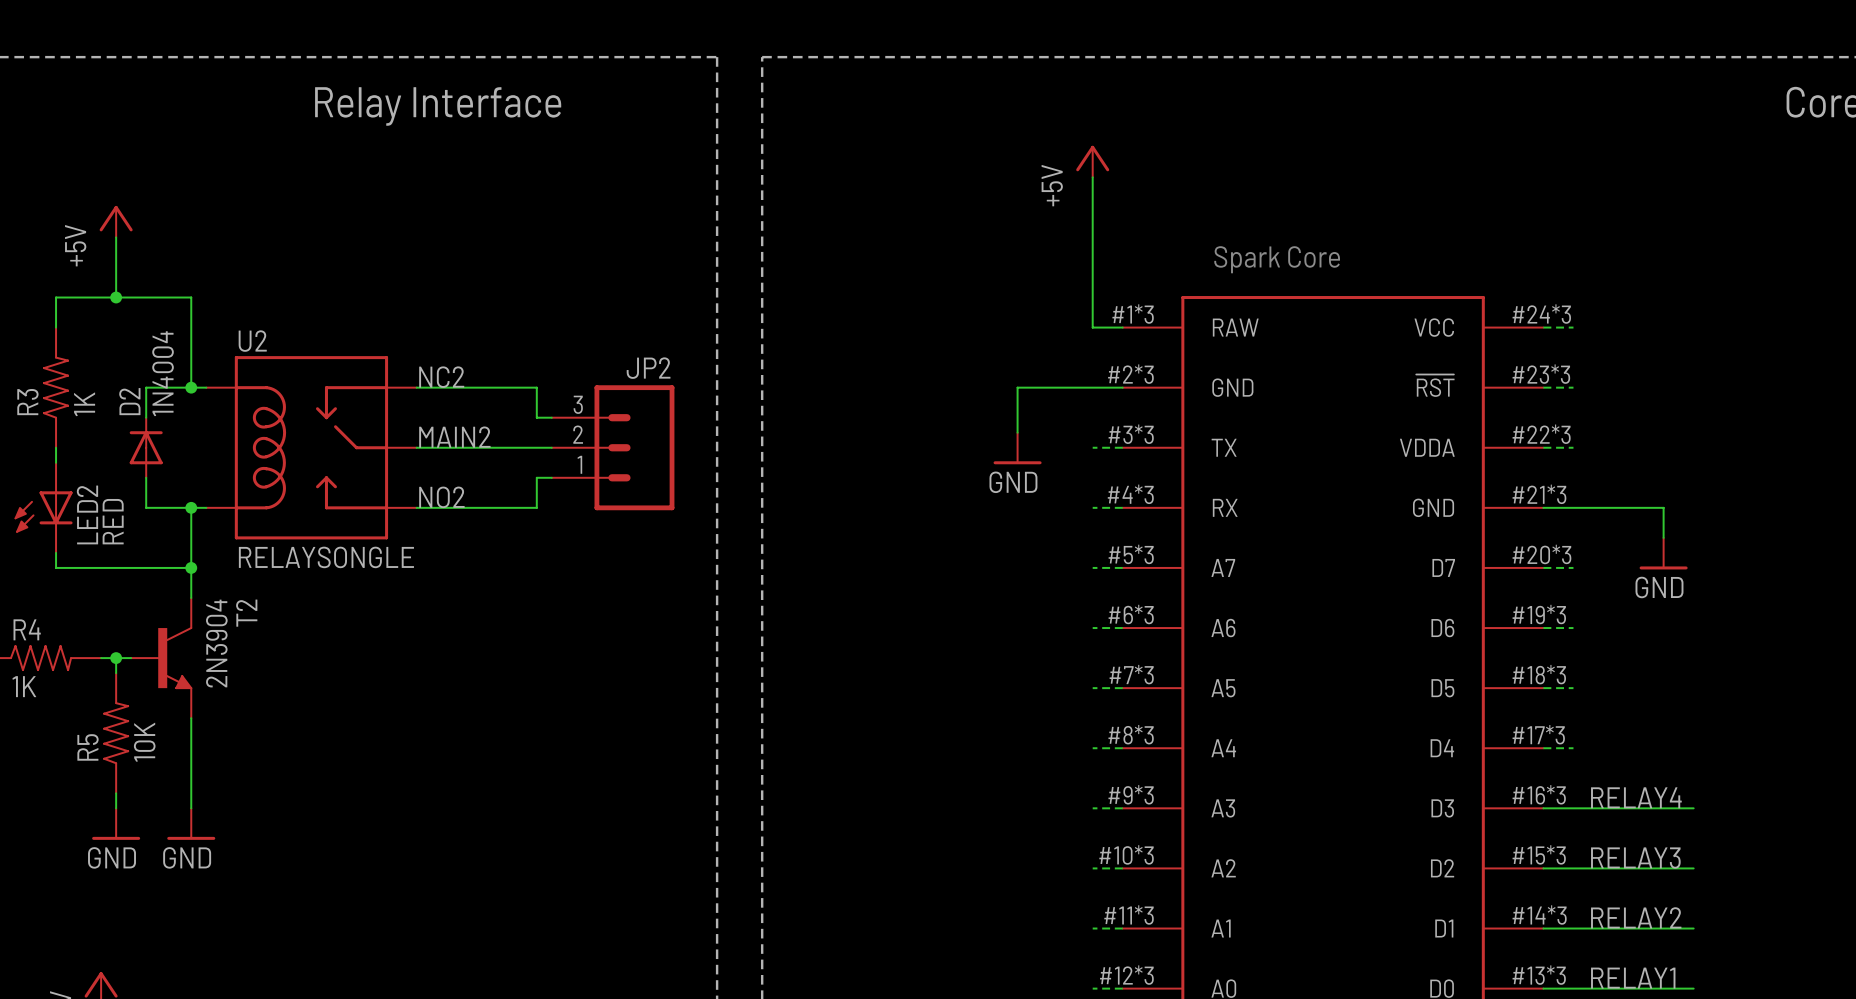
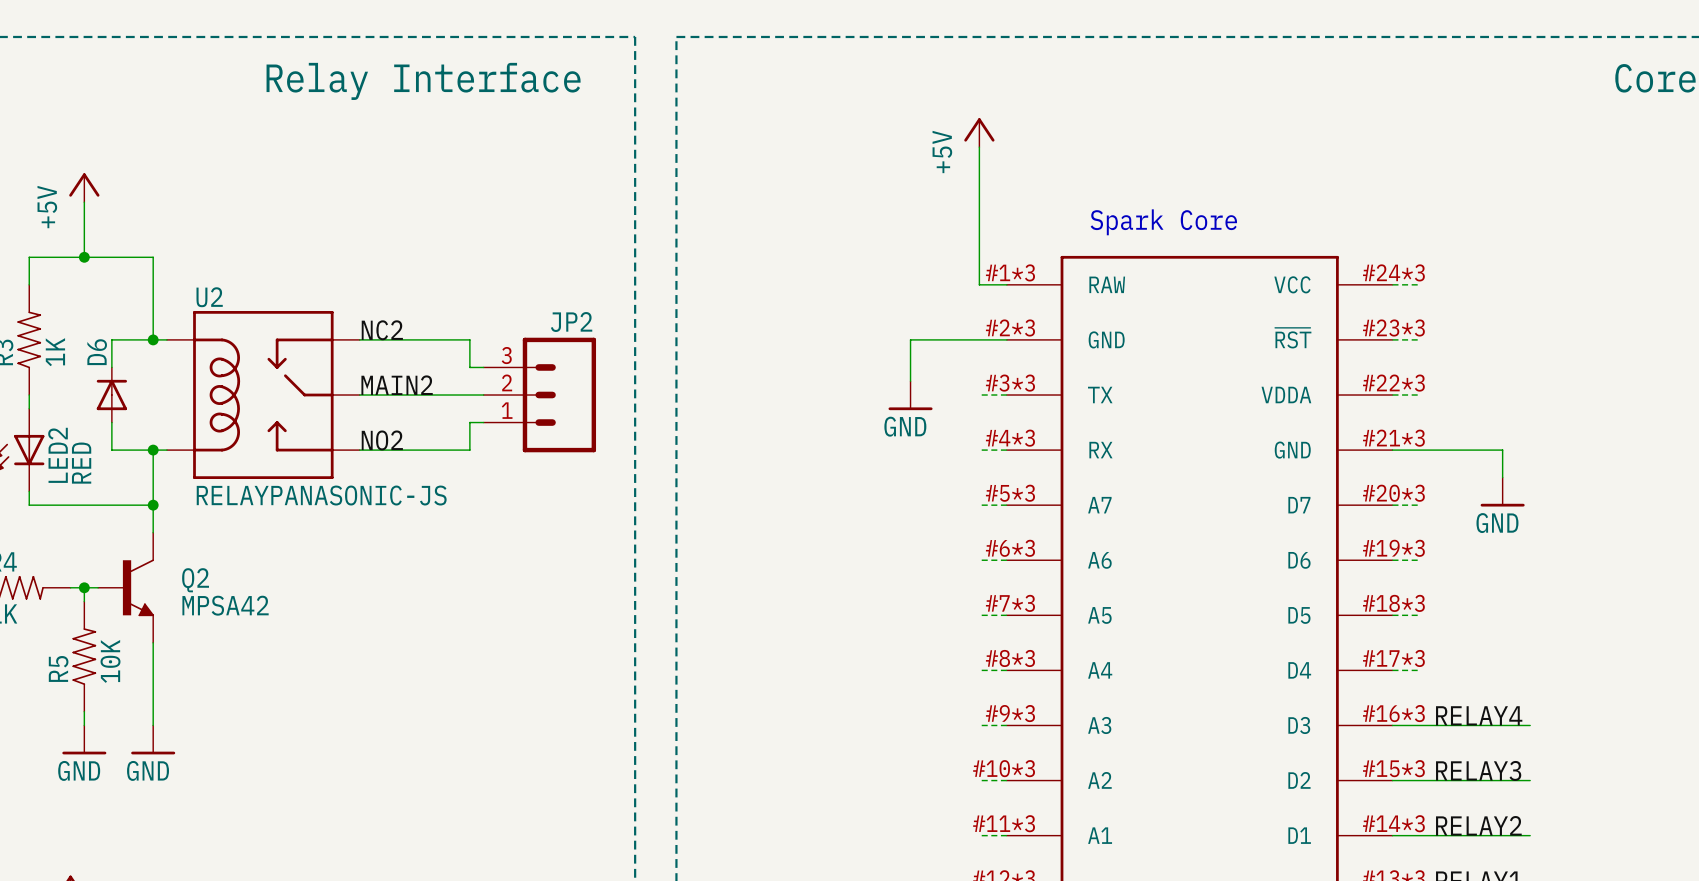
D2 value: 1N4004 (163, 373) -> none
D2 name: D2 (129, 401) -> D6 (97, 352)
U2 value: RELAYSONGLE (326, 557) -> RELAYPANASONIC-JS (321, 495)
T2 name: T2 (246, 613) -> Q2 (195, 580)
T2 value: 2N3904 (216, 643) -> MPSA42 (225, 605)

